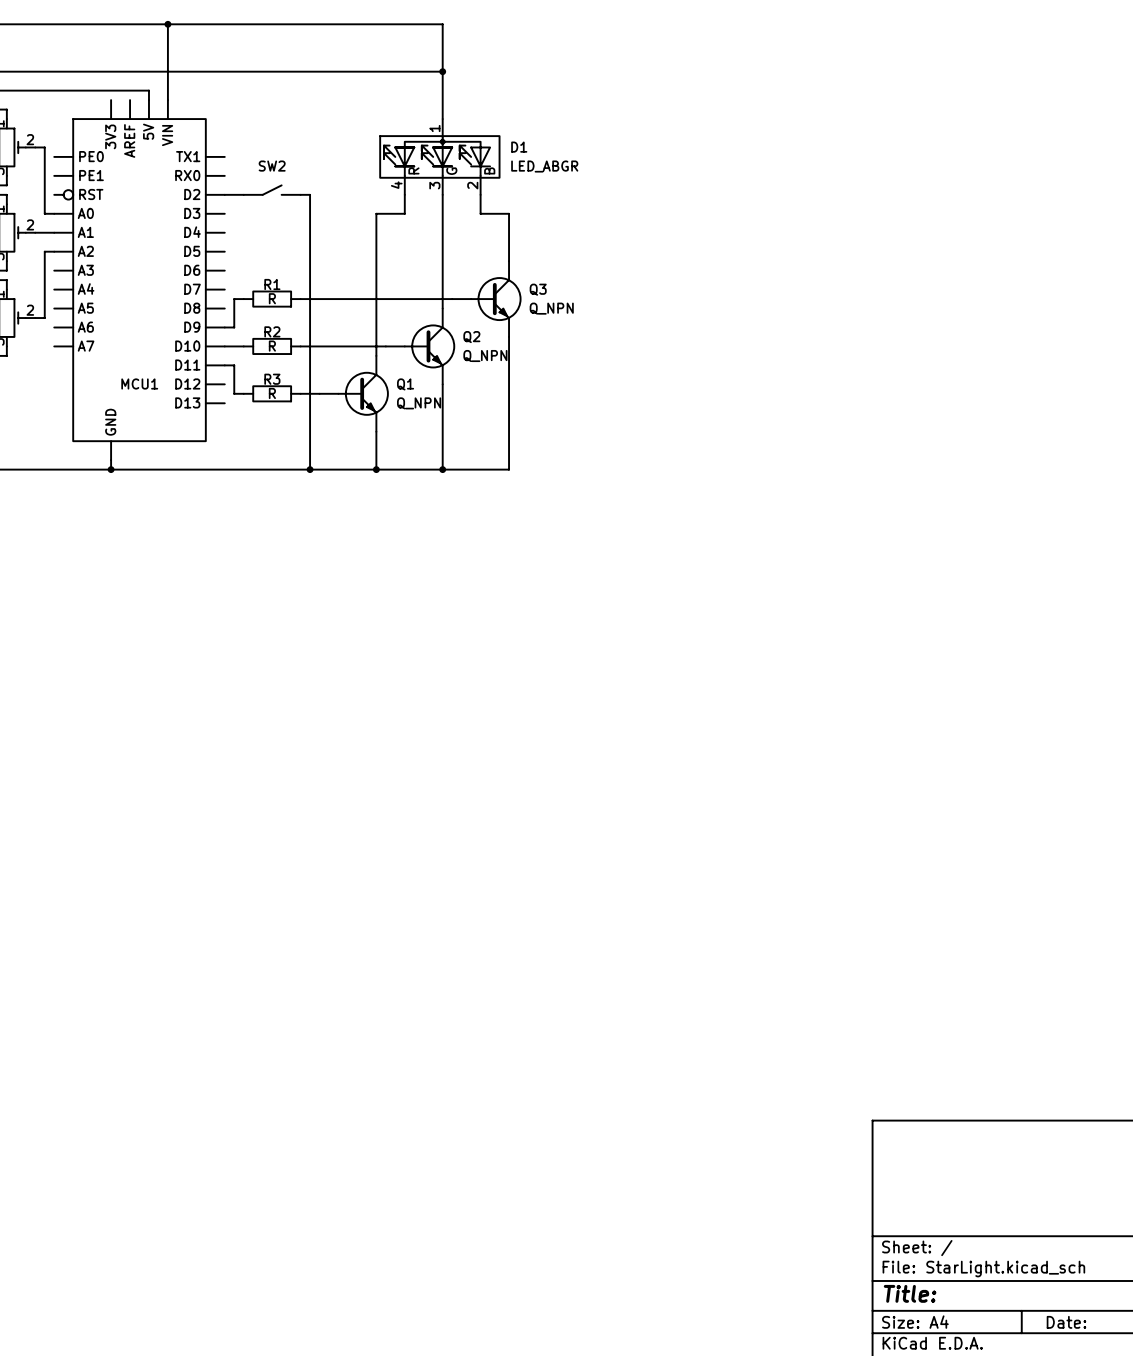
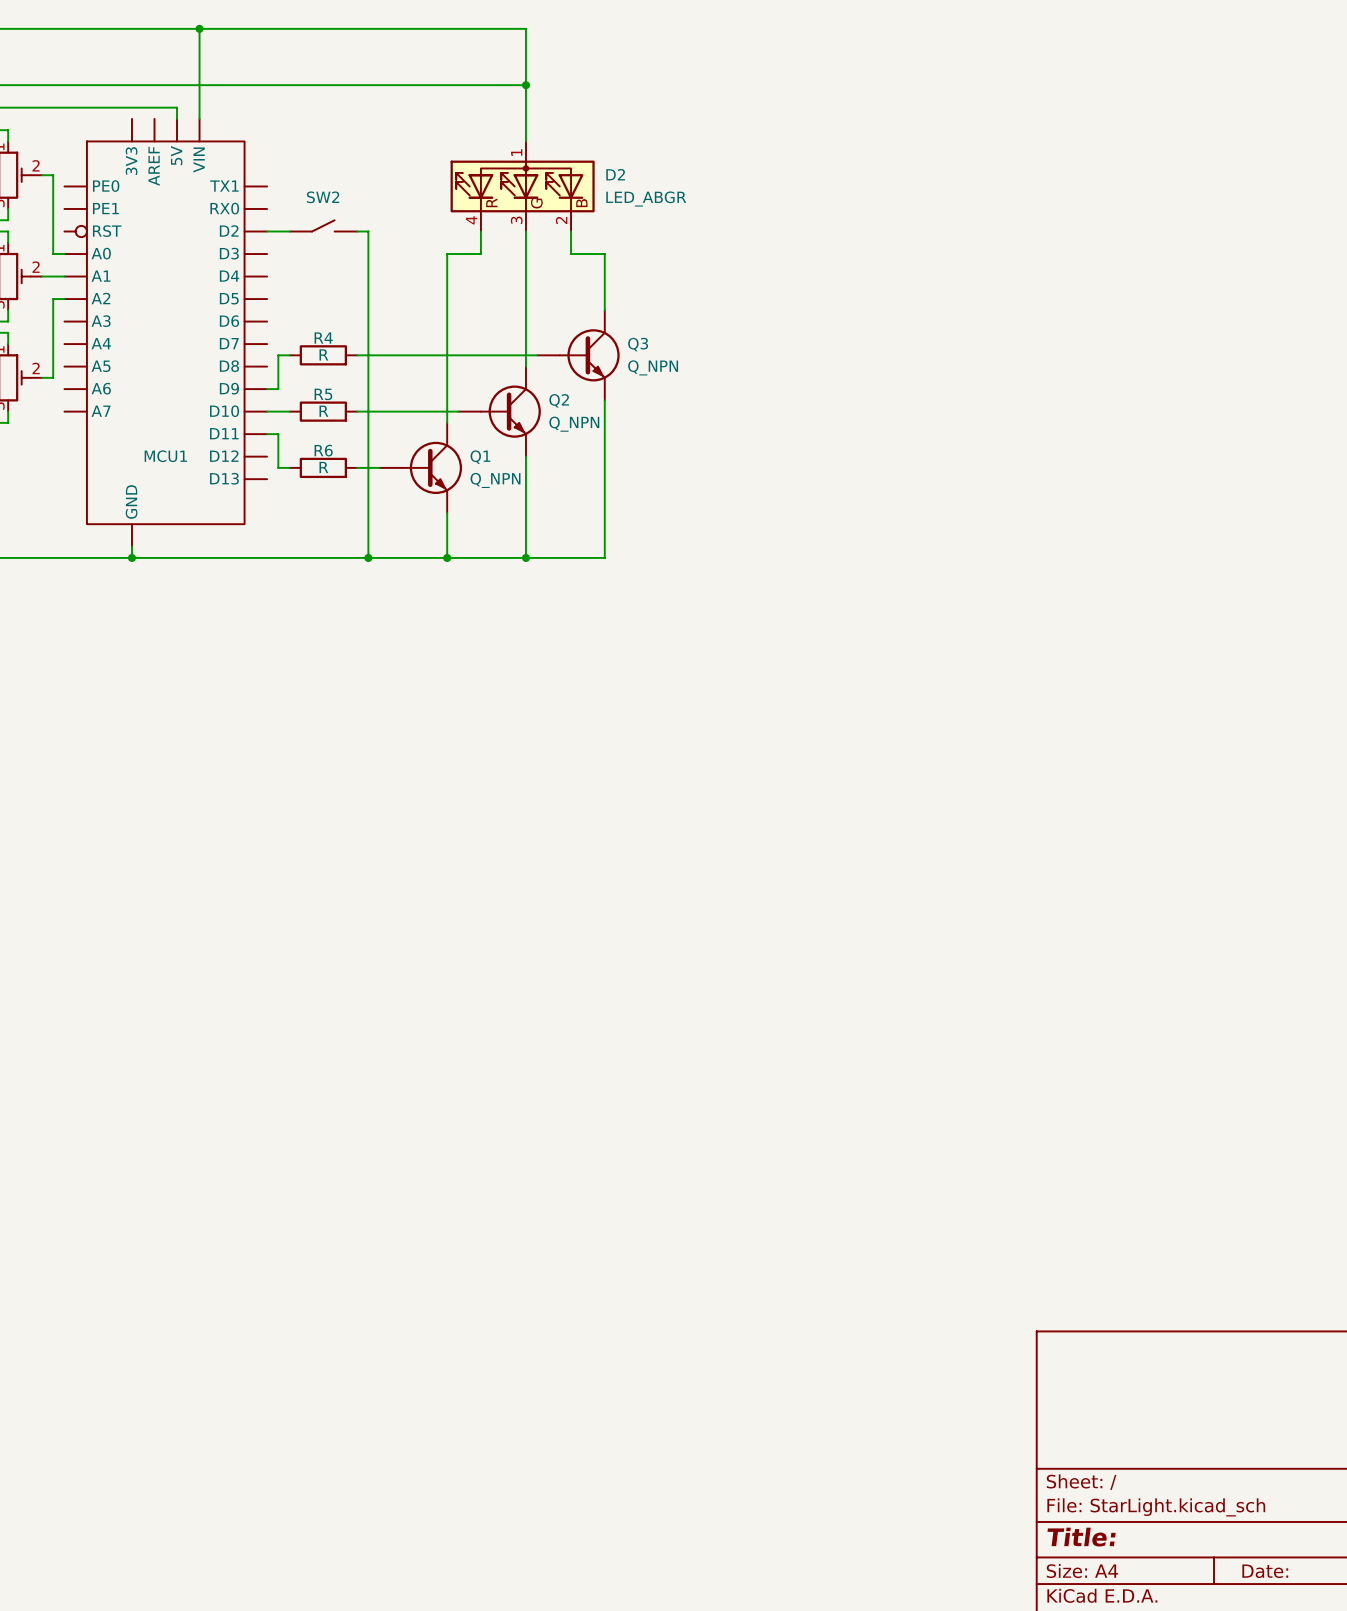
D1 name: D1 (519, 147) -> D2 (615, 174)
R1 name: R1 (272, 284) -> R4 (323, 338)
R2 name: R2 (272, 331) -> R5 (323, 394)
R3 name: R3 (272, 379) -> R6 (323, 450)

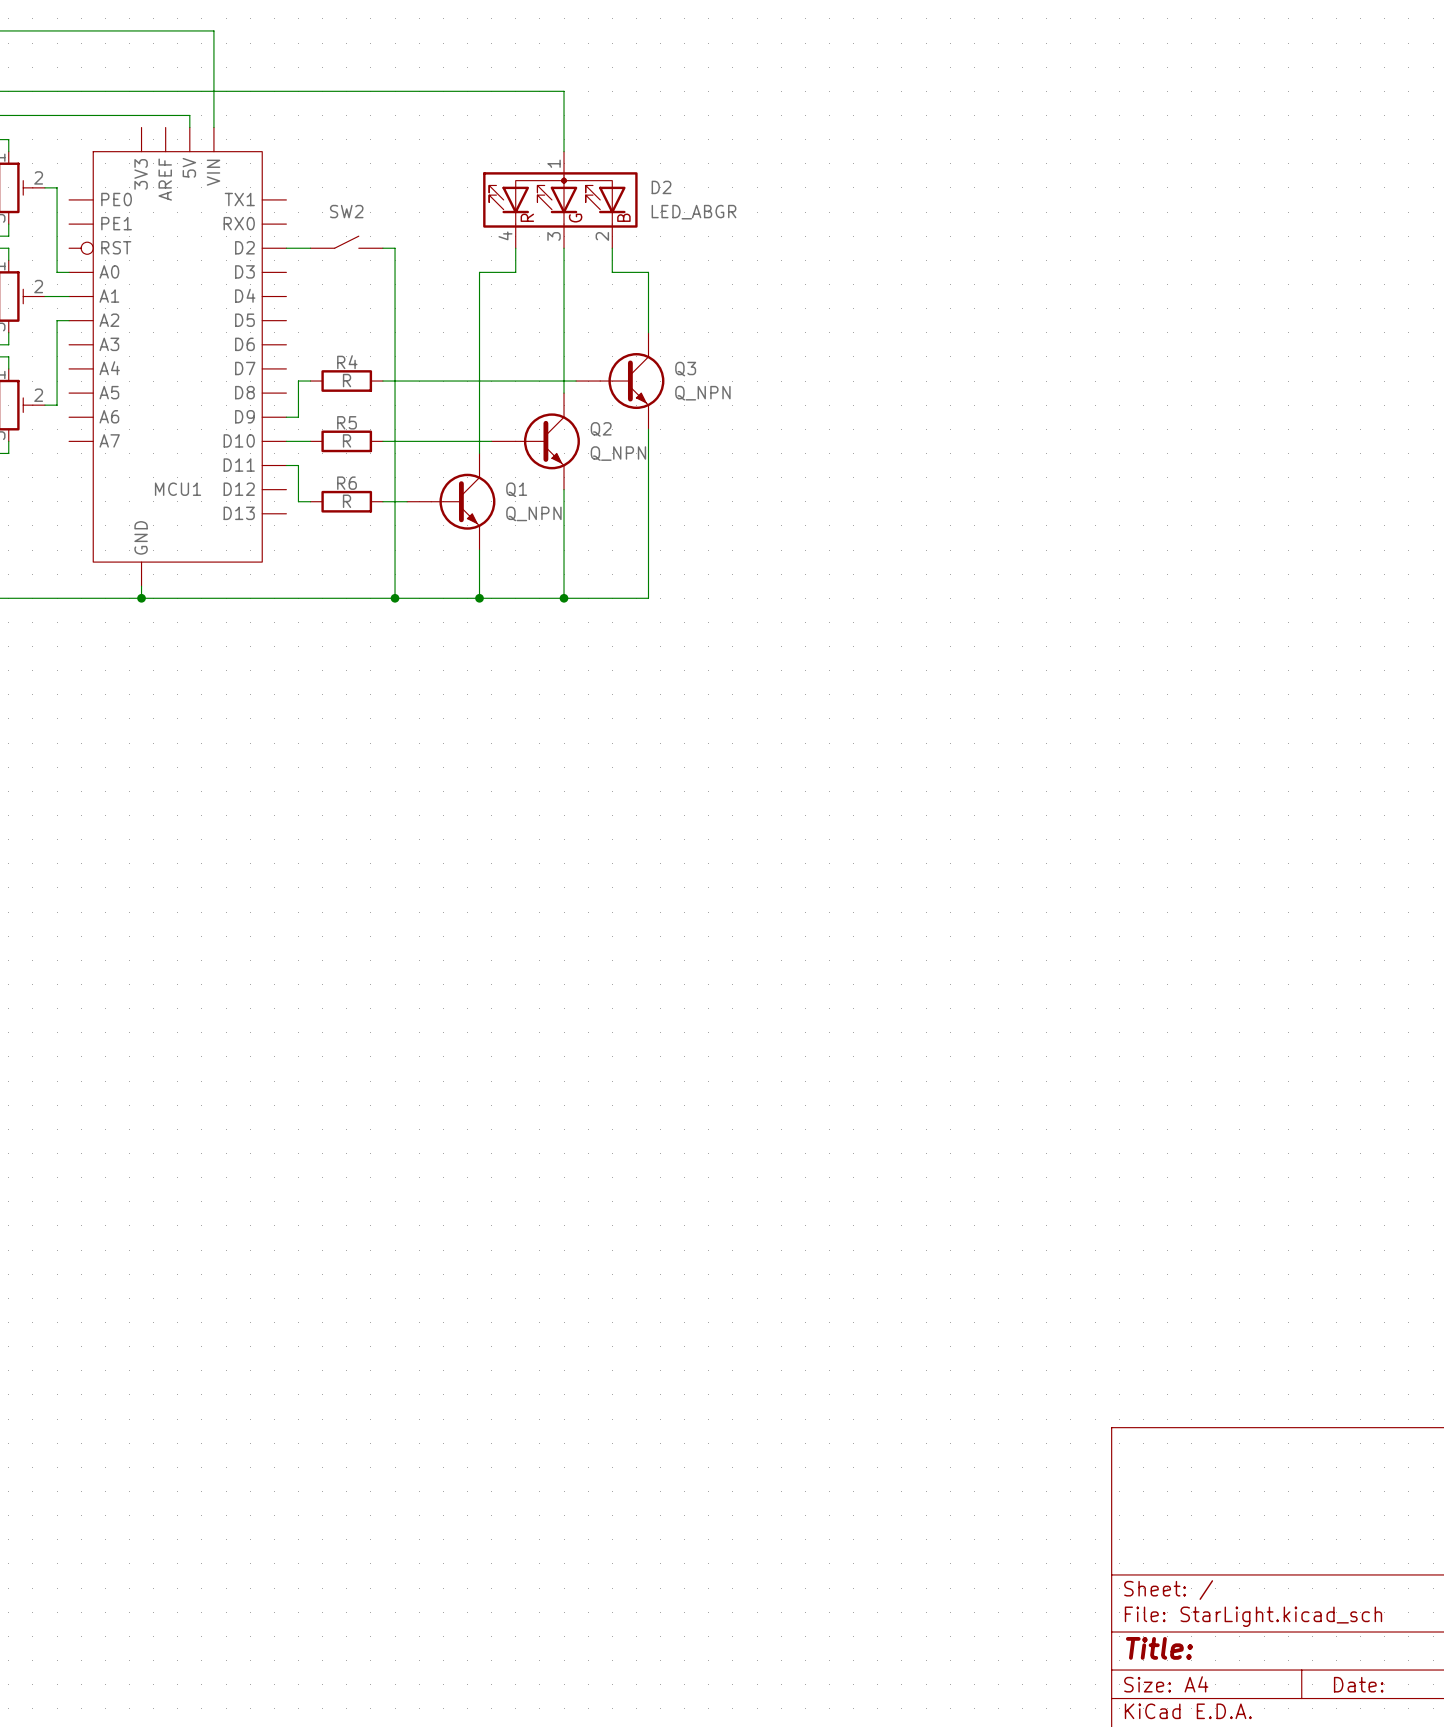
wire: (199, 28) (525, 28) (525, 85) -> none
junction: (199, 28) -> none
junction: (525, 85) -> none

